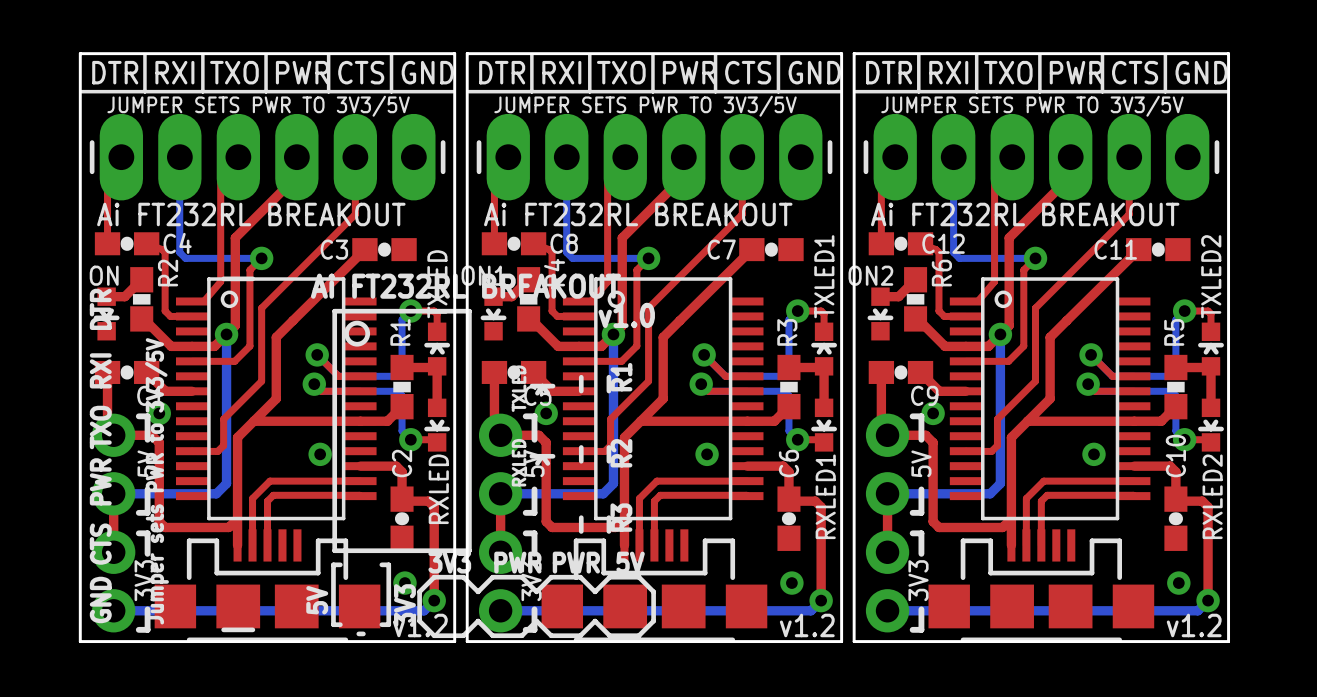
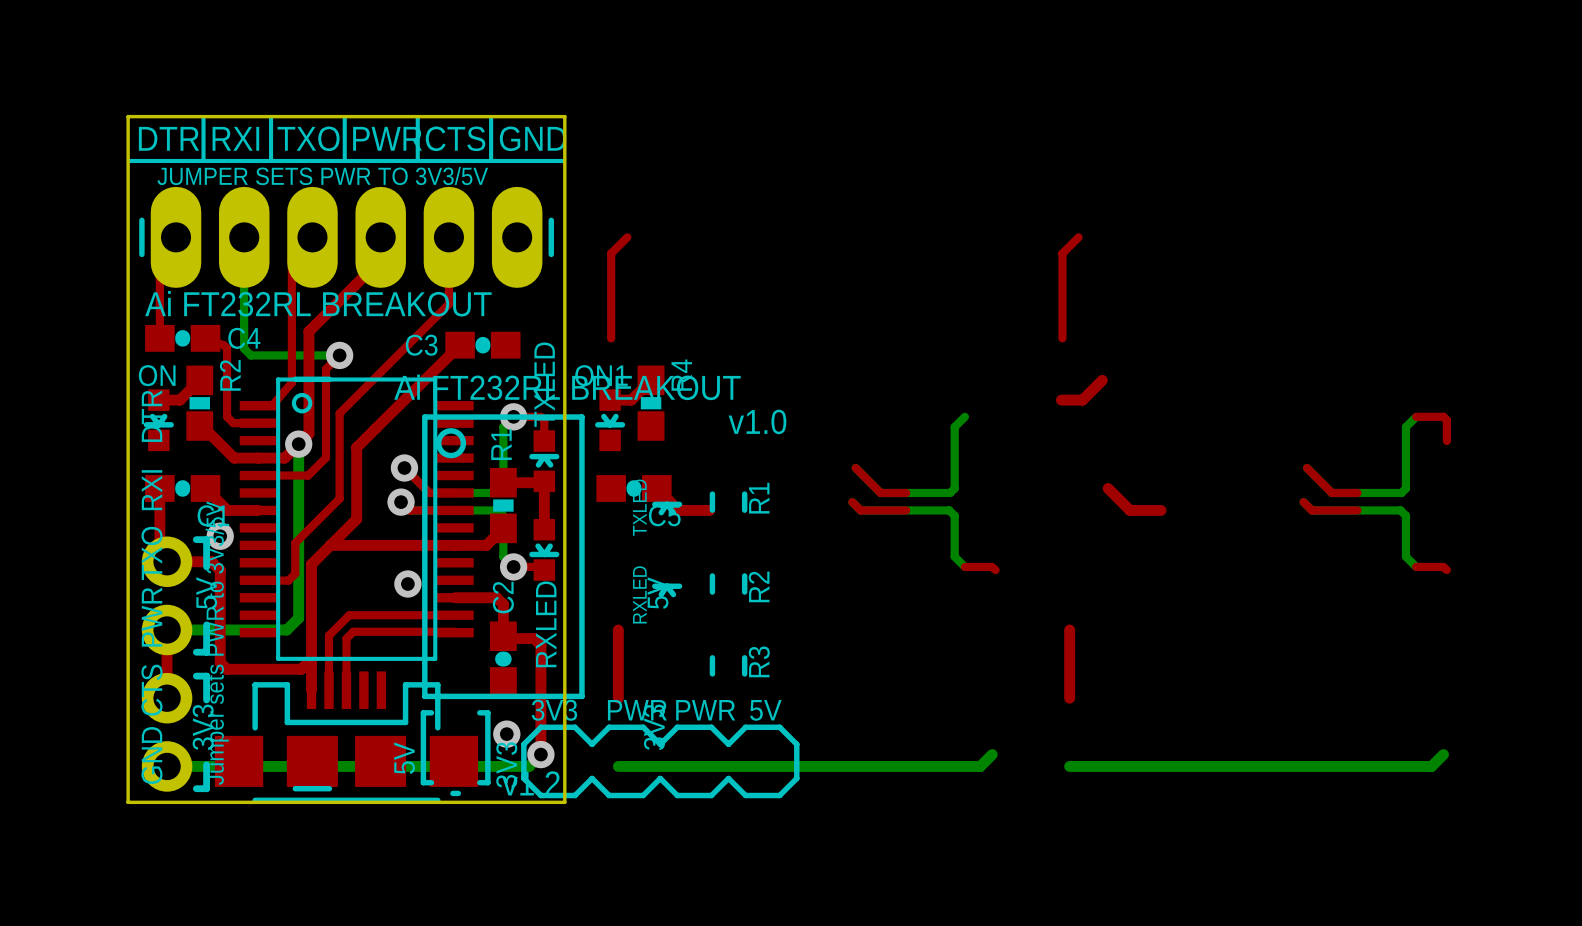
board edge: (467, 53) (467, 641) (841, 641) (841, 53) (467, 53) -> none
board edge: (854, 53) (1228, 53) (1228, 641) (854, 641) (854, 53) -> none
line: (531, 55) (531, 91) -> none
line: (589, 55) (589, 91) -> none
line: (652, 55) (652, 91) -> none
line: (715, 55) (715, 91) -> none
line: (778, 55) (778, 91) -> none
line: (918, 55) (918, 91) -> none
line: (976, 55) (976, 91) -> none
line: (1039, 55) (1039, 91) -> none
line: (1102, 55) (1102, 91) -> none
line: (1165, 55) (1165, 91) -> none
text: DTR (502, 72) -> none
text: RXI (561, 72) -> none
text: TXO (621, 72) -> none
text: PWR (689, 72) -> none
text: CTS (748, 72) -> none
text: GND (814, 72) -> none
text: DTR (889, 72) -> none
text: RXI (948, 72) -> none
text: TXO (1008, 72) -> none
text: PWR (1076, 72) -> none
text: CTS (1135, 72) -> none
text: GND (1201, 72) -> none
line: (468, 91) (840, 91) -> none
line: (855, 91) (1227, 91) -> none
text: JUMPER SETS PWR TO 3V3/5V (645, 106) -> none
text: JUMPER SETS PWR TO 3V3/5V (1032, 106) -> none
bottom track: (566, 157) (566, 252) (572, 258) (648, 258) -> none
top track: (625, 157) (607, 174) (607, 281) (590, 301) (579, 301) -> none
part: (654, 157) -> none
top track: (683, 157) (683, 176) (622, 237) (622, 325) (601, 346) (558, 346) (528, 318) -> none
top track: (742, 157) (742, 214) (648, 308) (648, 381) (610, 419) (610, 445) (604, 451) (579, 451) -> none
bottom track: (953, 157) (953, 252) (959, 258) (1035, 258) -> none
top track: (1012, 157) (994, 174) (994, 281) (977, 301) (965, 301) -> none
part: (1041, 157) -> none
top track: (1070, 157) (1070, 176) (1009, 237) (1009, 325) (988, 346) (945, 346) (915, 318) -> none
top track: (1129, 157) (1129, 214) (1035, 308) (1035, 381) (997, 419) (997, 445) (991, 451) (966, 451) -> none
text: Ai FT232RL BREAKOUT (638, 214) -> none
text: Ai FT232RL BREAKOUT (1025, 214) -> none
C8: (514, 243) -> none
top track: (533, 243) (552, 252) (552, 311) (557, 316) (579, 316) -> none
C12: (900, 243) -> none
top track: (920, 243) (938, 252) (938, 311) (944, 316) (965, 316) -> none
top track: (751, 249) (663, 337) (663, 398) (624, 437) (624, 545) -> none
C7: (771, 249) -> none
top track: (1138, 249) (1050, 337) (1050, 398) (1011, 437) (1011, 545) -> none
C11: (1158, 249) -> none
top track: (648, 258) (636, 270) (636, 346) (621, 361) (579, 361) -> none
via: (648, 258) -> none
top track: (1035, 258) (1023, 270) (1023, 346) (1008, 361) (965, 361) -> none
via: (1035, 258) -> none
R6: (915, 299) -> none
top track: (797, 311) (821, 311) (824, 313) (824, 331) -> none
via: (797, 311) -> none
via: (1184, 311) -> none
ON2: (880, 313) -> none
bottom track: (613, 334) (613, 483) (603, 493) (500, 493) -> none
via: (613, 334) -> none
bottom track: (1000, 334) (1000, 483) (990, 493) (887, 493) -> none
via: (1000, 334) -> none
TXLED1: (824, 349) -> none
TXLED2: (1210, 349) -> none
via: (704, 354) -> none
via: (1091, 354) -> none
top track: (788, 367) (824, 366) (824, 407) -> none
top track: (1175, 367) (1210, 366) (1210, 407) -> none
top track: (494, 372) (494, 429) (500, 435) (538, 435) (546, 442) (546, 521) (552, 527) (615, 527) (624, 518) -> none
top track: (881, 372) (881, 429) (887, 435) (925, 435) (933, 442) (933, 521) (938, 527) (1002, 527) (1011, 518) -> none
C9: (900, 372) -> none
via: (701, 384) -> none
via: (1088, 384) -> none
R3: (788, 387) -> none
R5: (1175, 387) -> none
part: (663, 398) -> none
part: (1050, 398) -> none
top track: (788, 406) (774, 421) (640, 421) -> none
top track: (1175, 406) (1161, 421) (1027, 421) -> none
via: (546, 413) -> none
via: (933, 413) -> none
line: (525, 416) (534, 416) (534, 439) -> none
line: (912, 416) (921, 416) (921, 439) -> none
RXLED1: (824, 425) -> none
RXLED2: (1210, 425) -> none
via: (797, 439) -> none
via: (1184, 439) -> none
via: (707, 454) -> none
via: (1094, 454) -> none
text: 5V (921, 463) -> none
top track: (747, 466) (783, 466) (788, 471) (788, 499) (791, 501) (815, 501) (821, 507) (821, 600) -> none
top track: (1134, 466) (1170, 466) (1175, 471) (1175, 499) (1177, 501) (1202, 501) (1208, 507) (1208, 600) -> none
top track: (747, 481) (656, 481) (639, 498) (639, 545) -> none
top track: (1134, 481) (1043, 481) (1026, 498) (1026, 545) -> none
line: (534, 489) (534, 512) (525, 512) -> none
line: (921, 489) (921, 512) (912, 512) -> none
top track: (747, 496) (660, 495) (654, 501) (654, 545) -> none
top track: (1134, 496) (1047, 495) (1041, 501) (1041, 545) -> none
C6: (788, 518) -> none
C10: (1175, 518) -> none
part: (500, 523) -> none
part: (887, 523) -> none
line: (525, 533) (534, 533) (534, 553) -> none
line: (912, 533) (921, 533) (921, 553) -> none
text: 3V3 (918, 580) -> none
via: (791, 583) -> none
via: (1178, 583) -> none
part: (654, 585) -> none
part: (1041, 585) -> none
via: (821, 600) -> none
via: (1208, 600) -> none
line: (534, 609) (534, 629) (525, 629) -> none
line: (921, 609) (921, 629) (912, 629) -> none
text: v1.2 (807, 625) -> none
text: v1.2 (1194, 625) -> none

